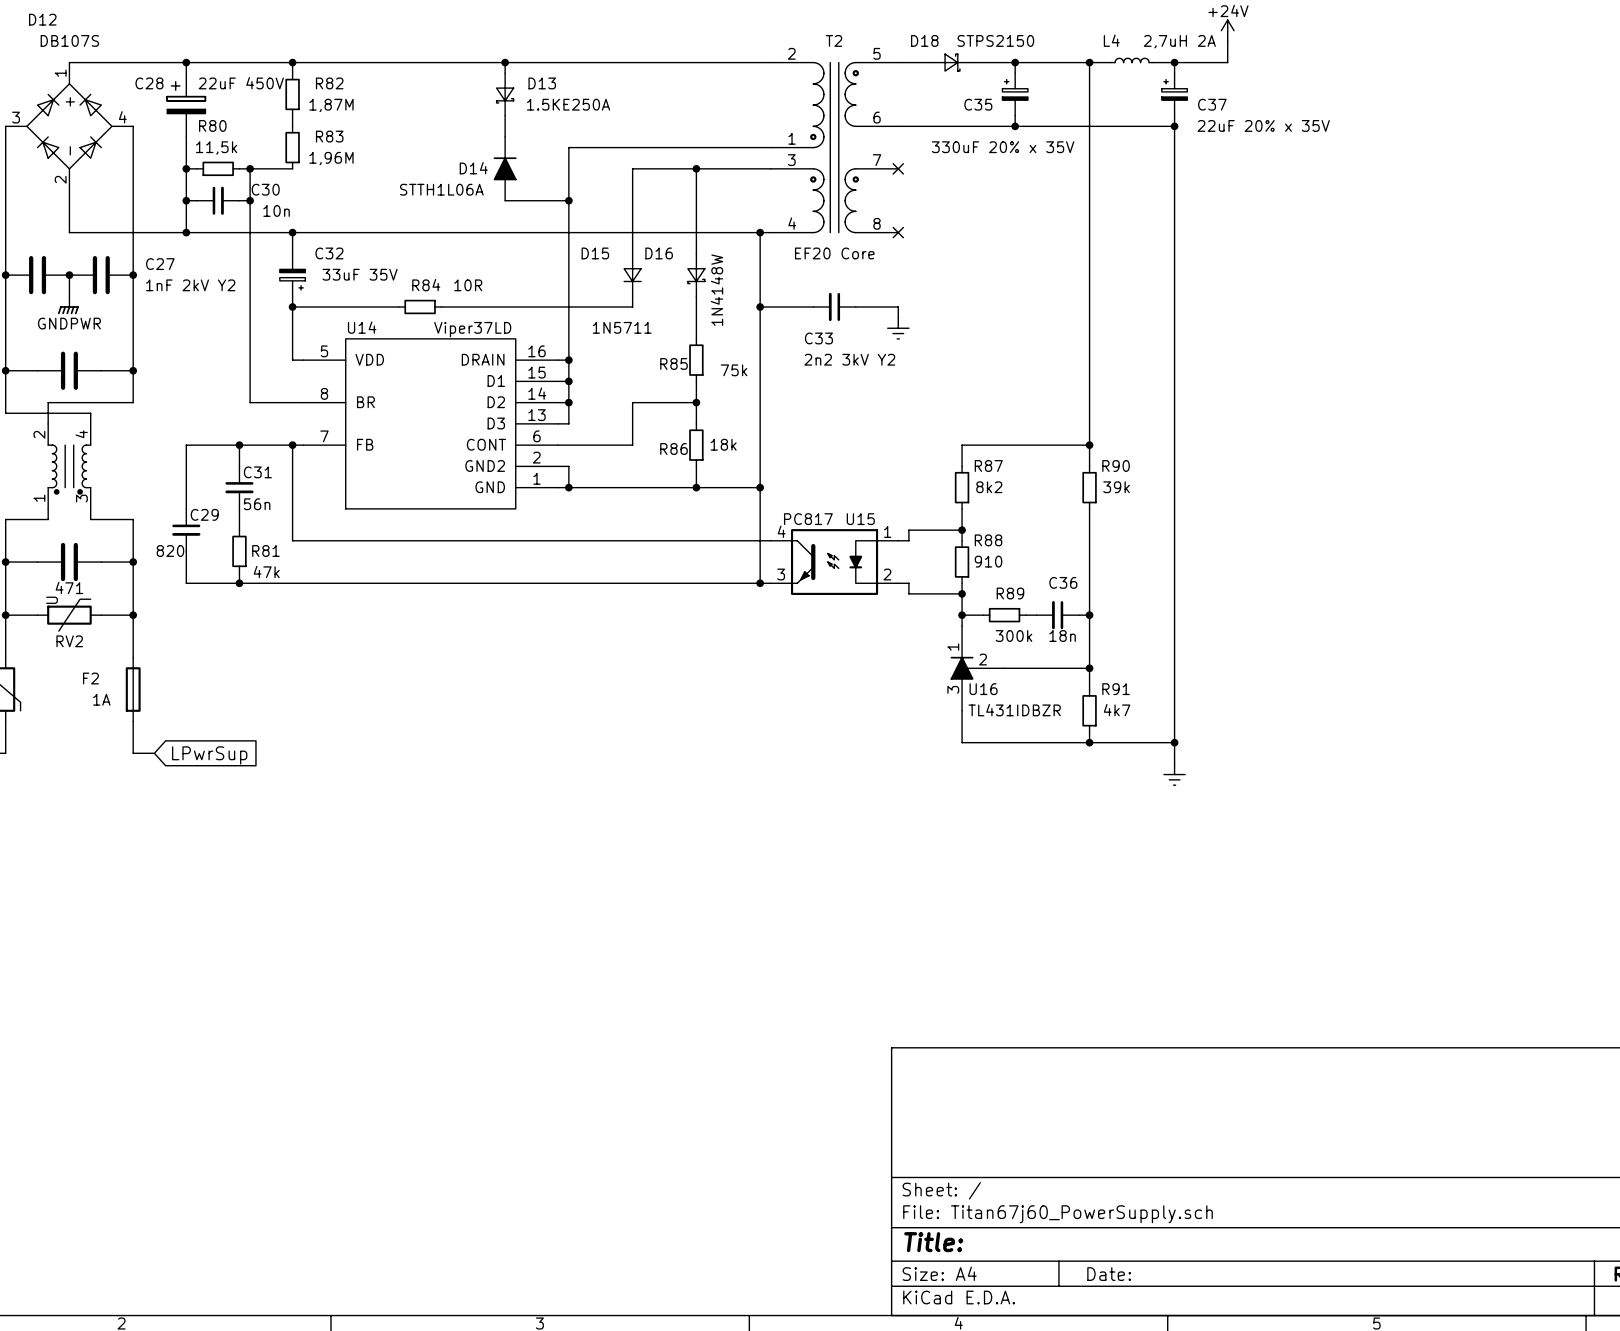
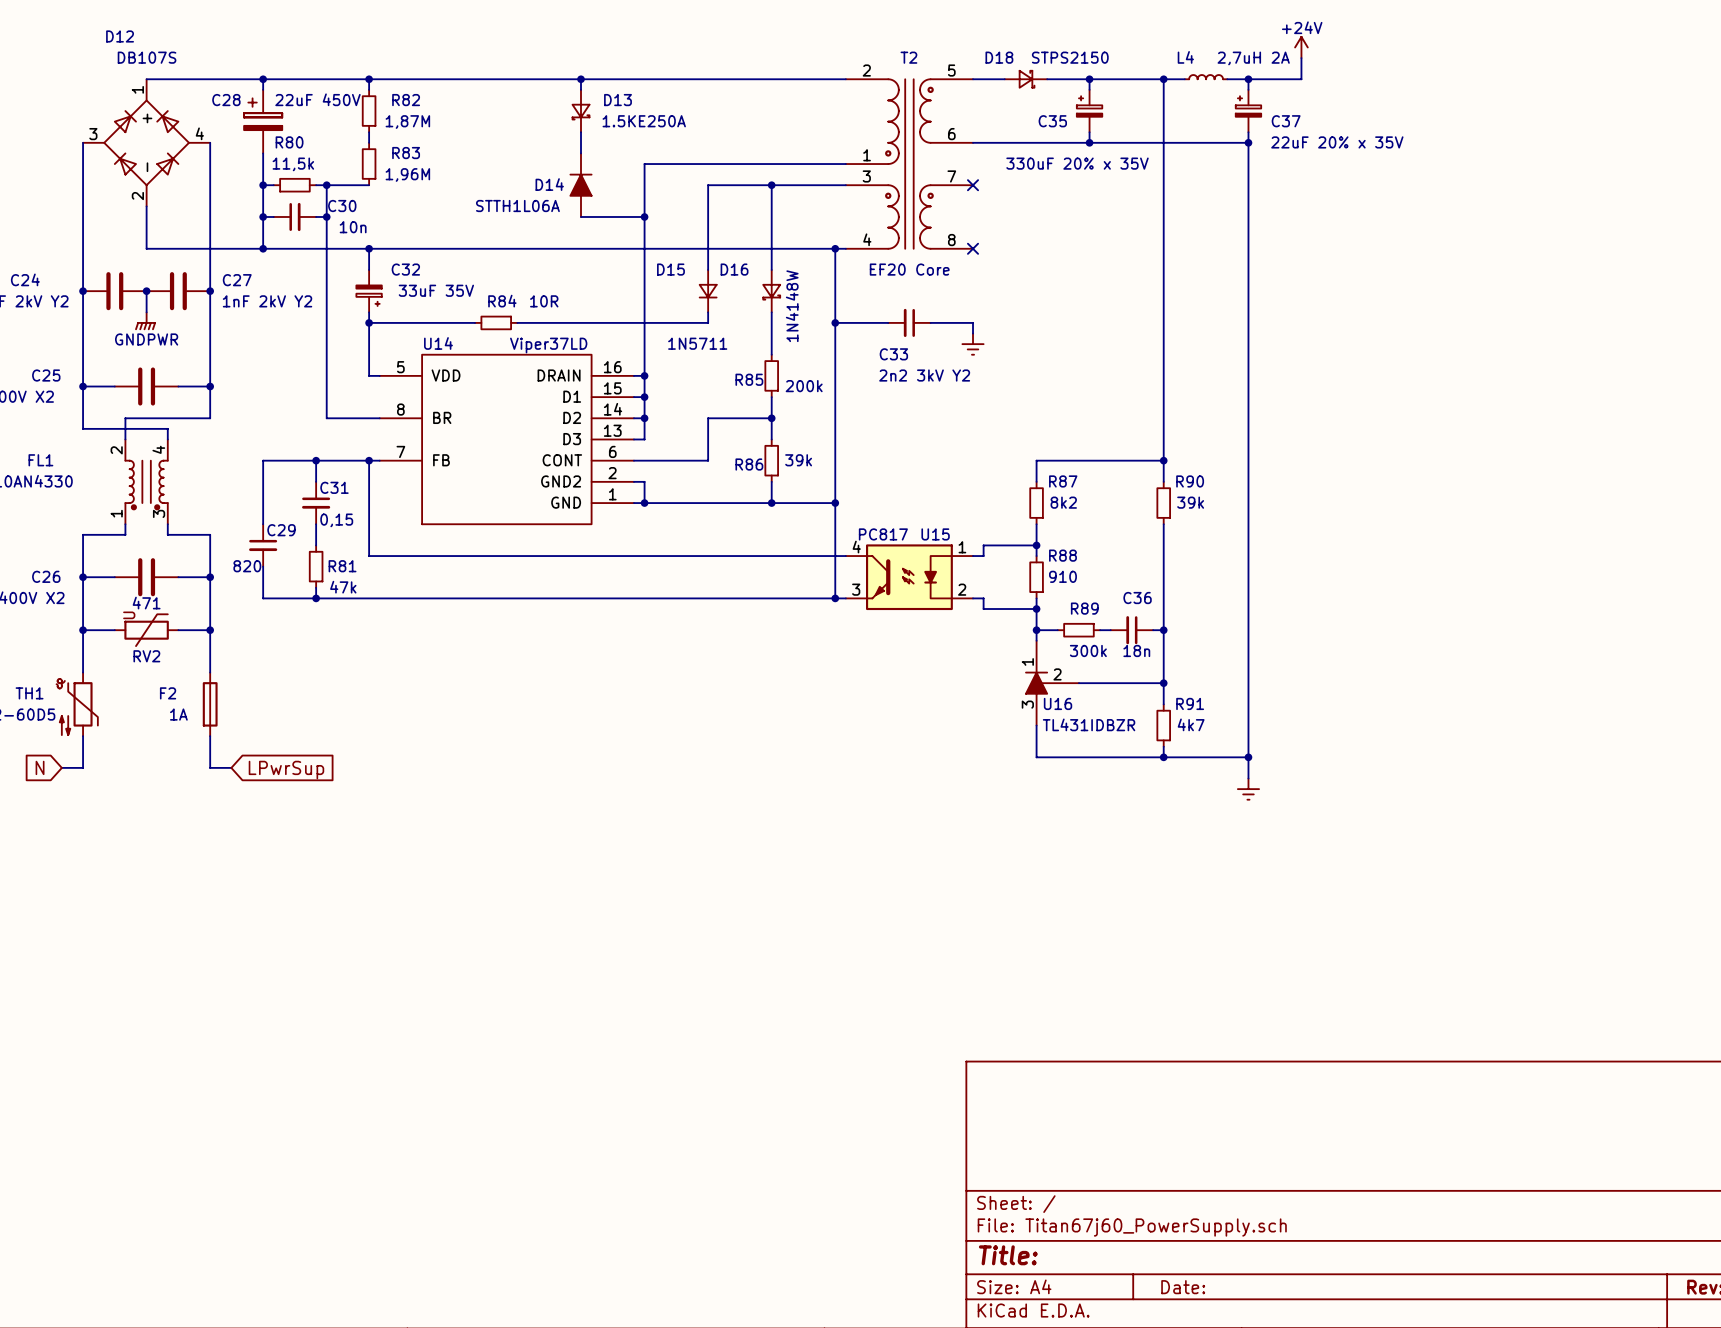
R85 value: 75k (734, 370) -> 200k (804, 386)
R86 value: 18k (723, 444) -> 39k (798, 460)
C31 value: 56n (257, 504) -> 0,15 (336, 520)

